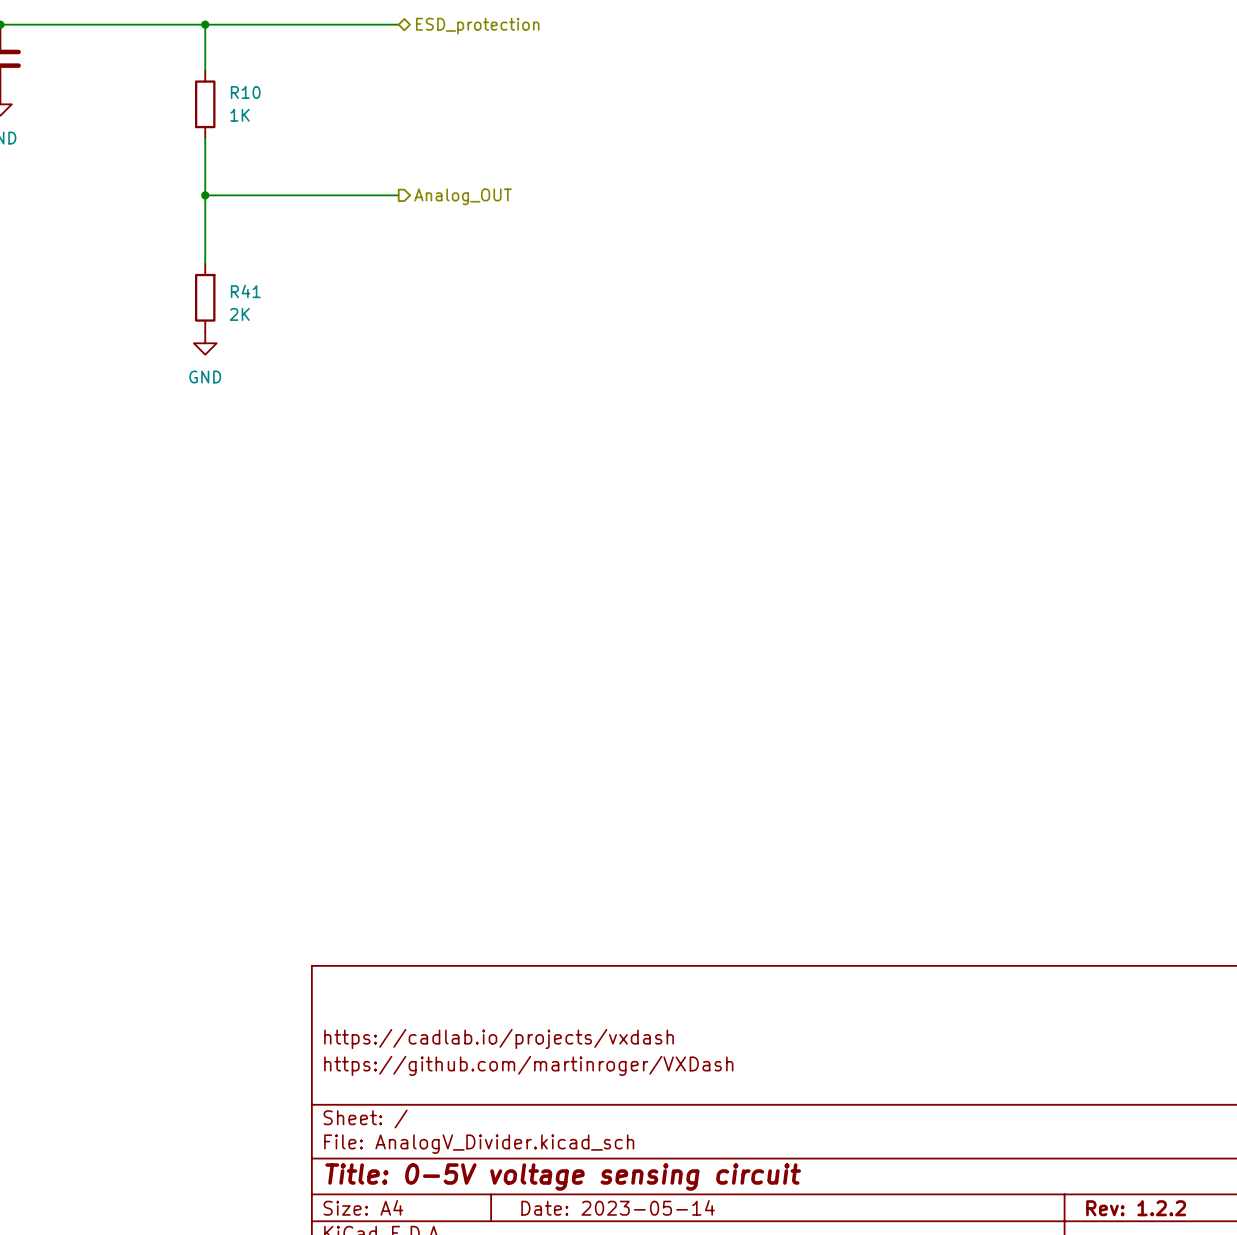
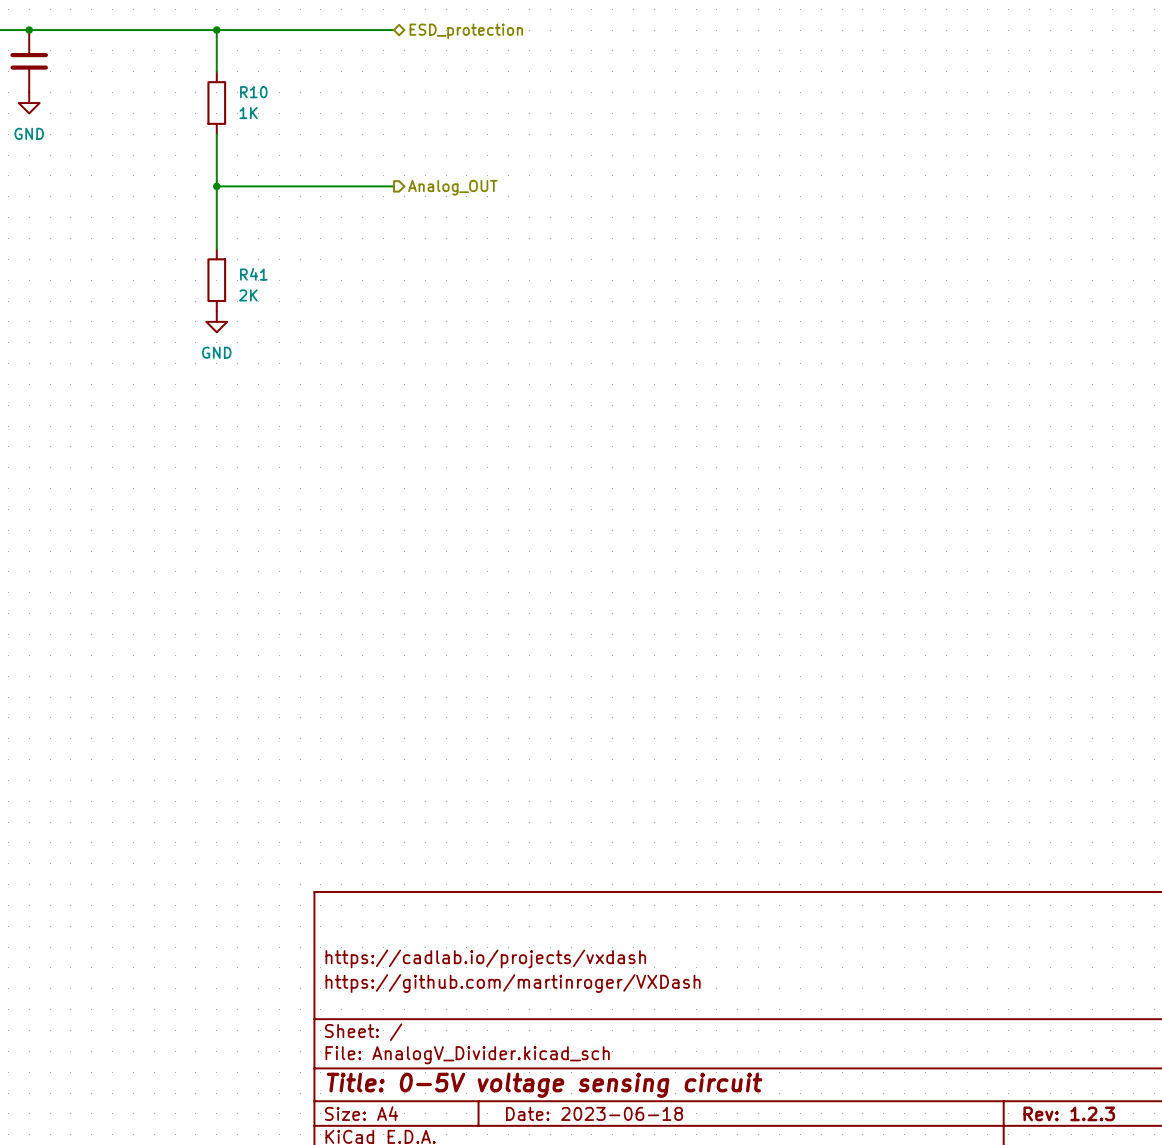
title block: Date: 2023-05-14 (618, 1207) -> Date: 2023-06-18 (594, 1113)
title block: Rev: 1.2.2 (1136, 1208) -> Rev: 1.2.3 (1069, 1113)

